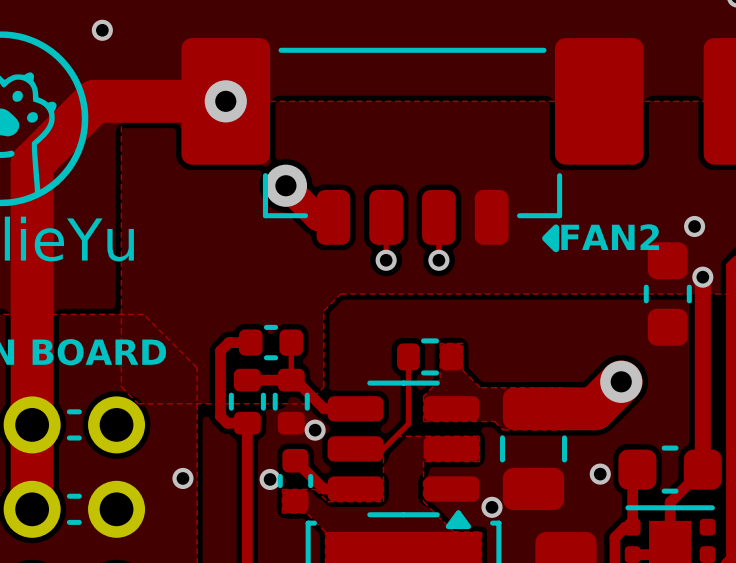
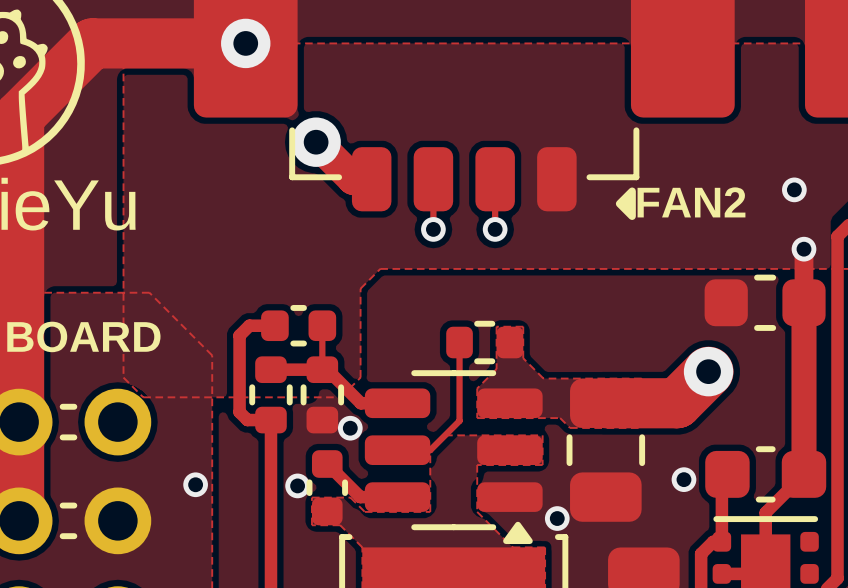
part rotation: 0° (667, 294) -> 90° clockwise (765, 302)
track width: thin (702, 322) (702, 469) -> thick (803, 302) (803, 474)

